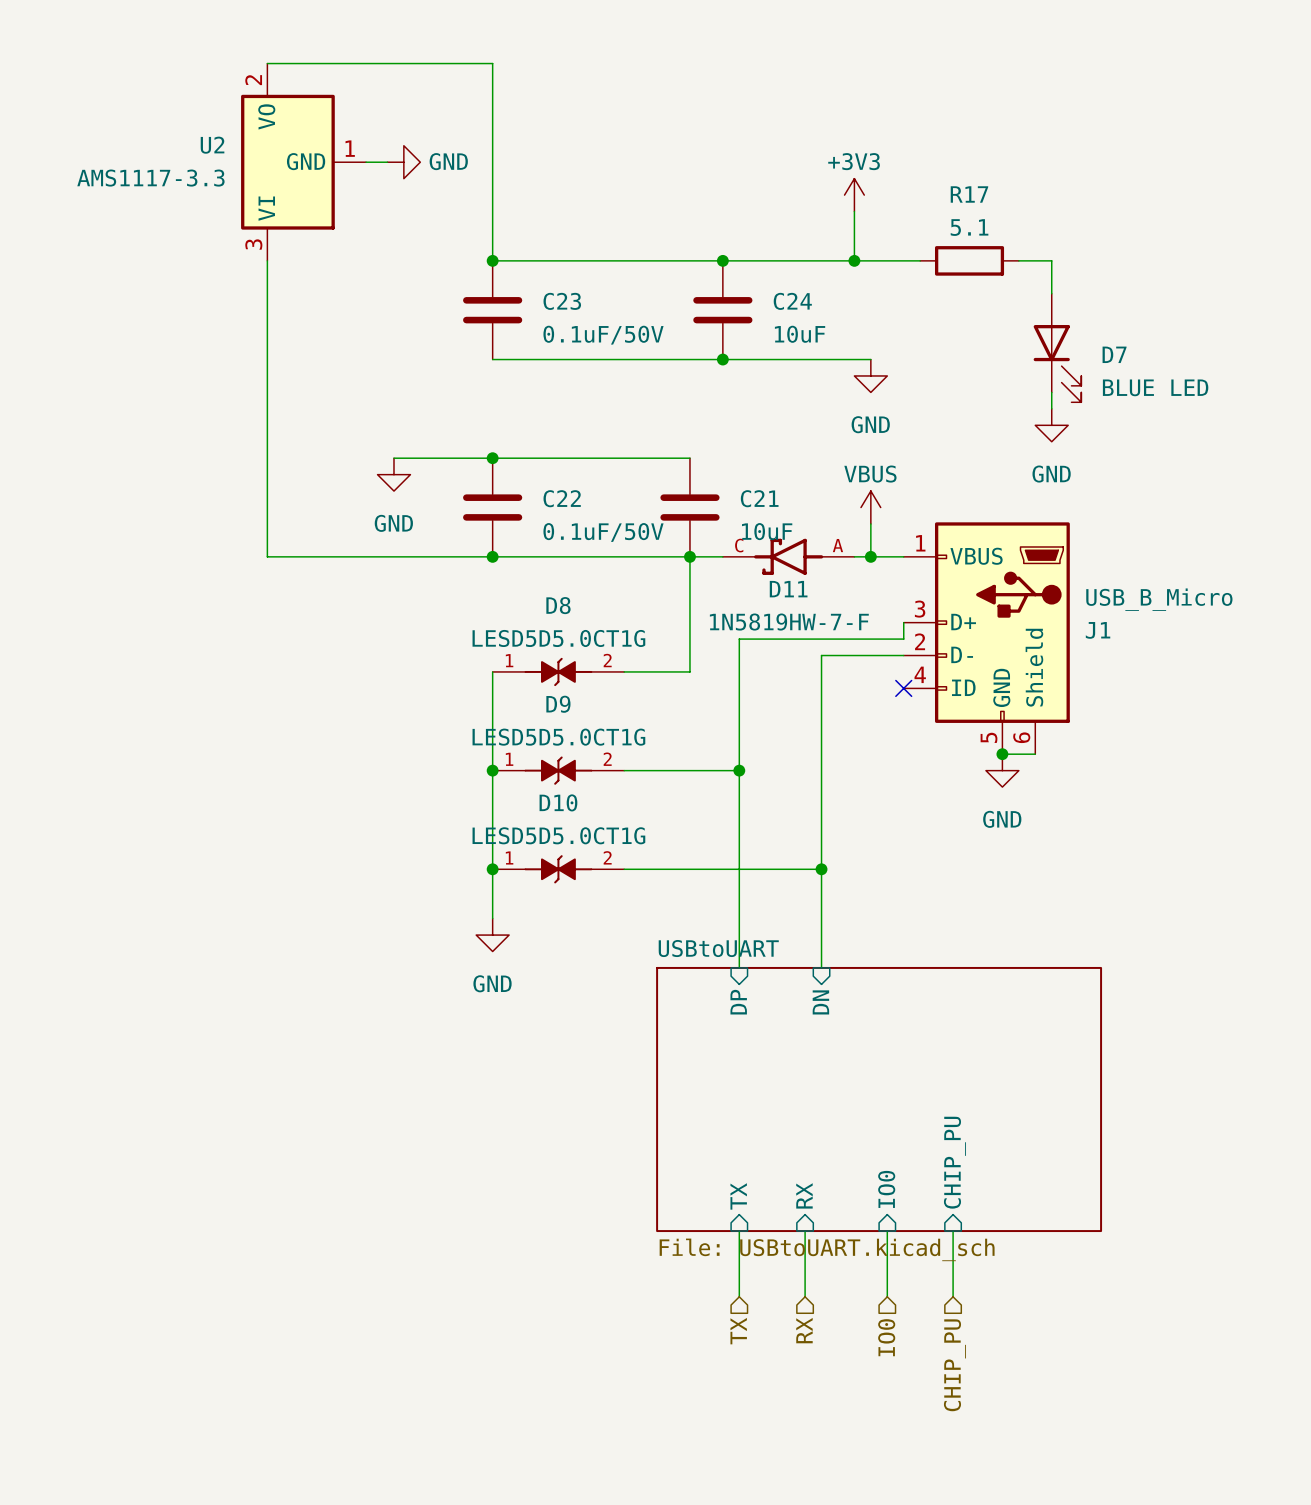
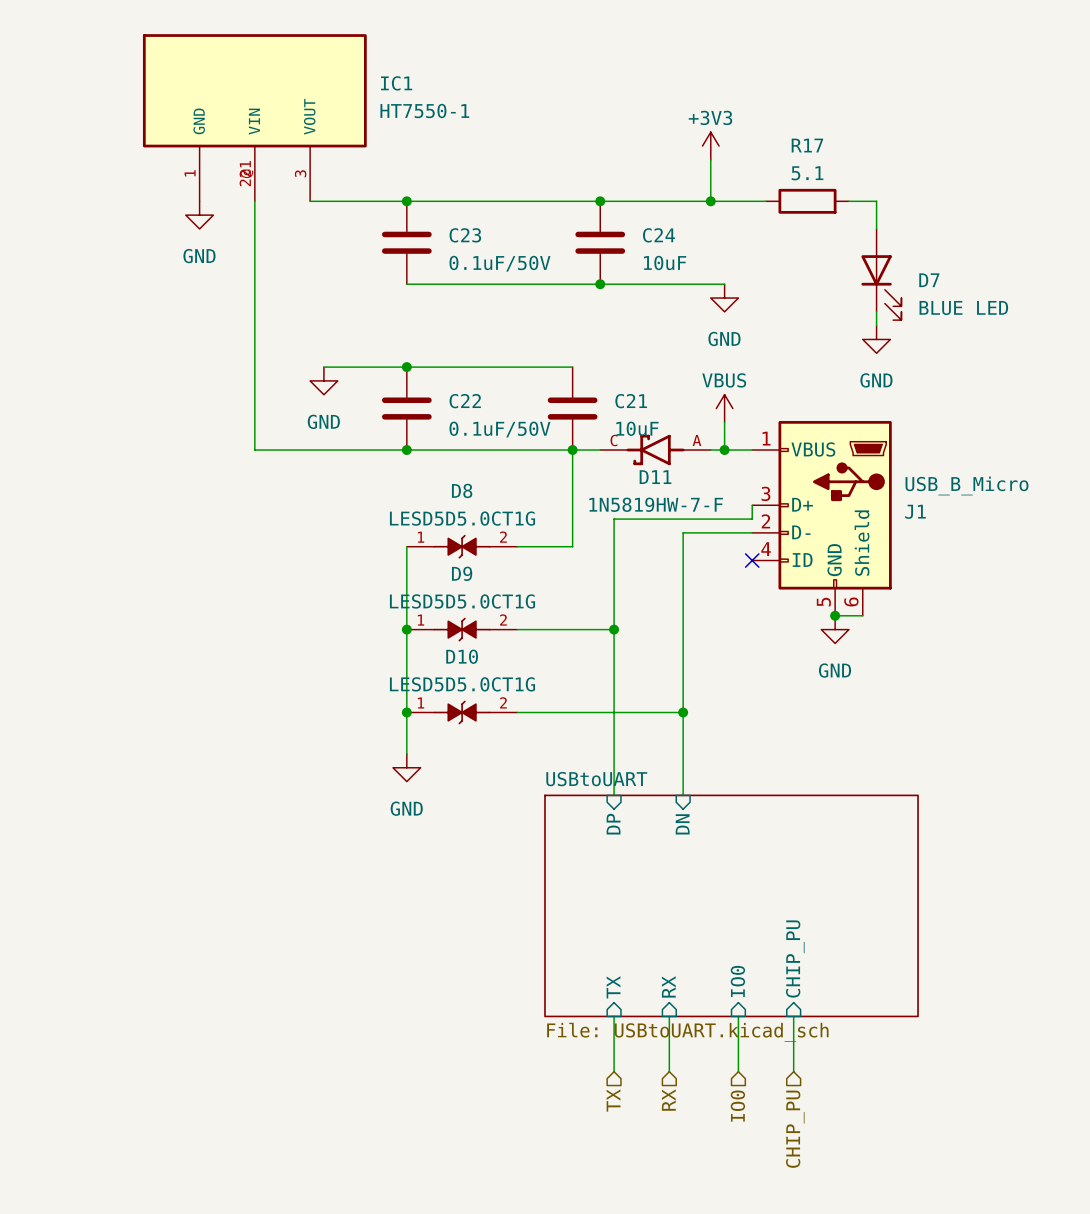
wire: (267, 63) (492, 63) (492, 260) -> (310, 201) (406, 201)
IC1: none -> HT7550-1 (254, 117)
U2: AMS1117-3.3 (303, 162) -> none
power symbol rotation: 0° (403, 162) -> 90° clockwise (199, 215)
power symbol position: GND (403, 162) -> GND (199, 215)
wire: (267, 260) (267, 556) (311, 556) -> (254, 201) (254, 450)

